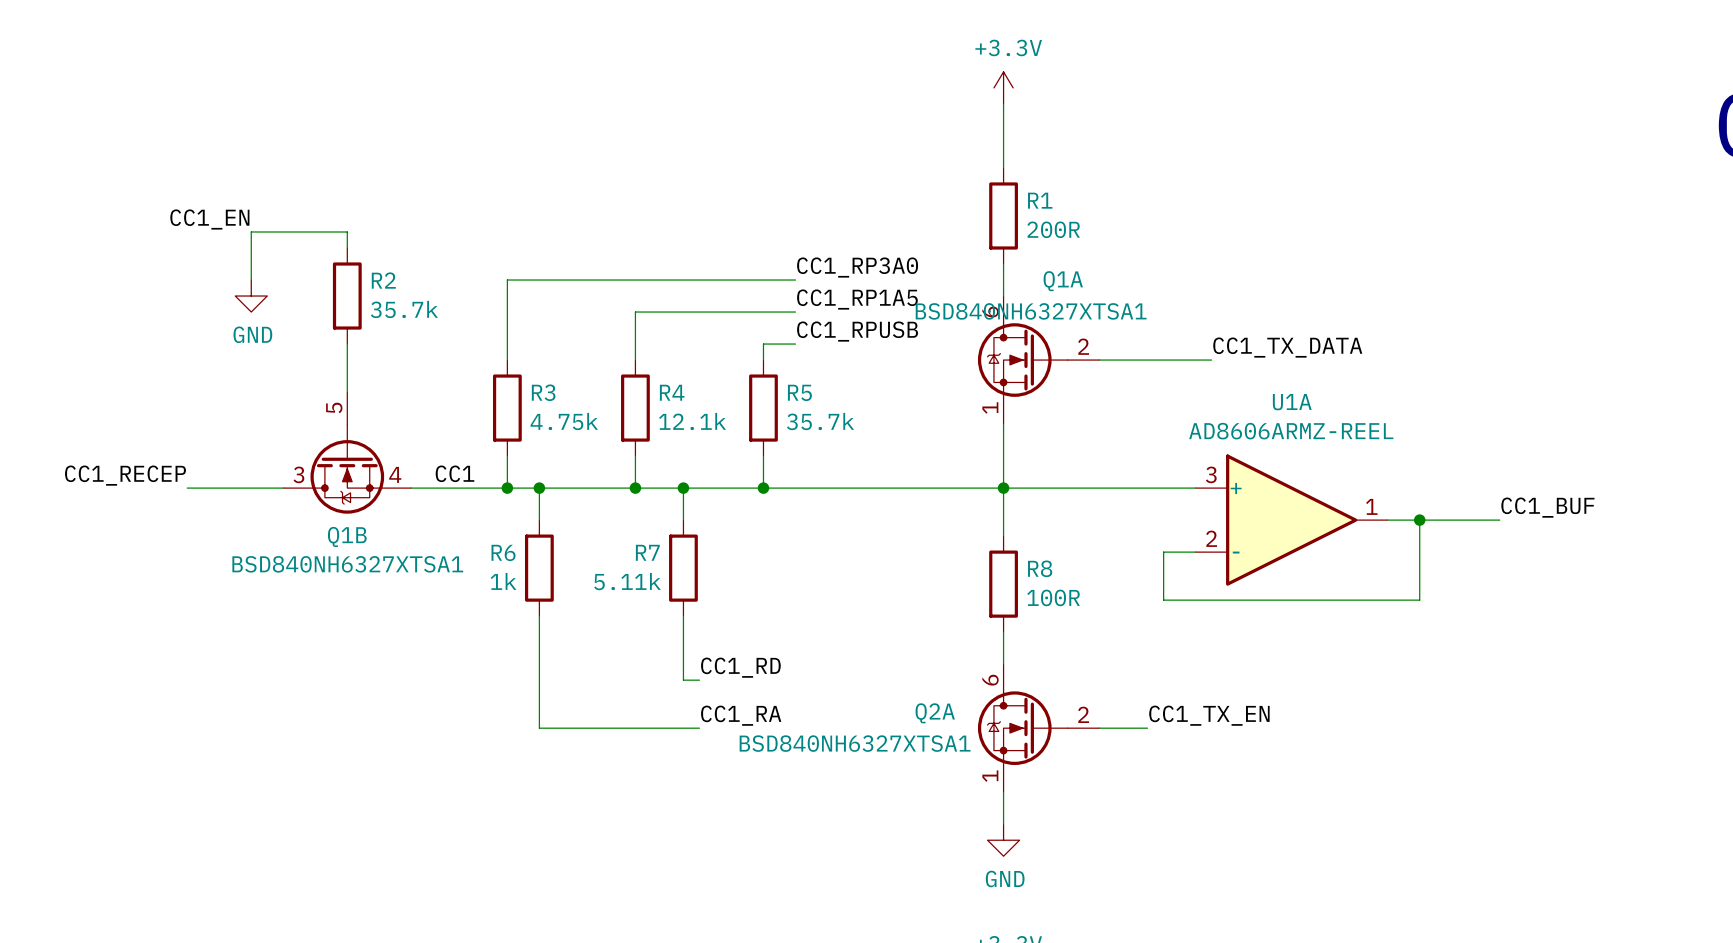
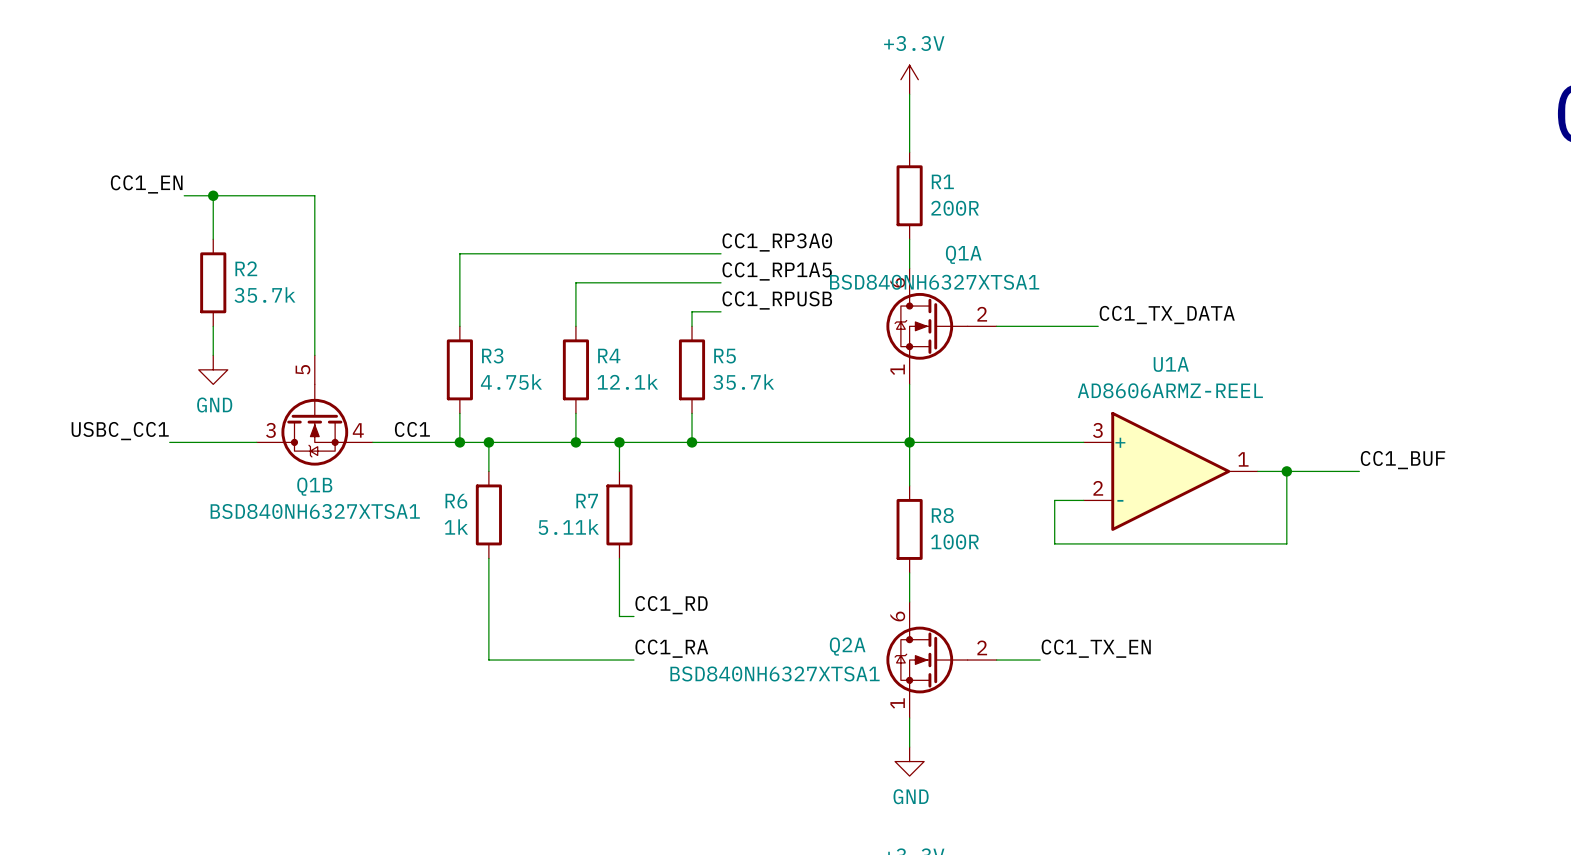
wire: none -> (213, 195) (213, 239)
junction: none -> (213, 195)
label position: CC1_EN (209, 219) -> CC1_EN (146, 184)
wire: (347, 231) (251, 231) (251, 280) -> (314, 210) (314, 195) (184, 195)
wire: none -> (314, 224) (314, 311)
power symbol position: GND (251, 296) -> GND (213, 369)
R2 position: (347, 296) -> (213, 282)
wire: none -> (213, 326) (213, 355)
label: CC1_RECEP (125, 475) -> USBC_CC1 (120, 431)

